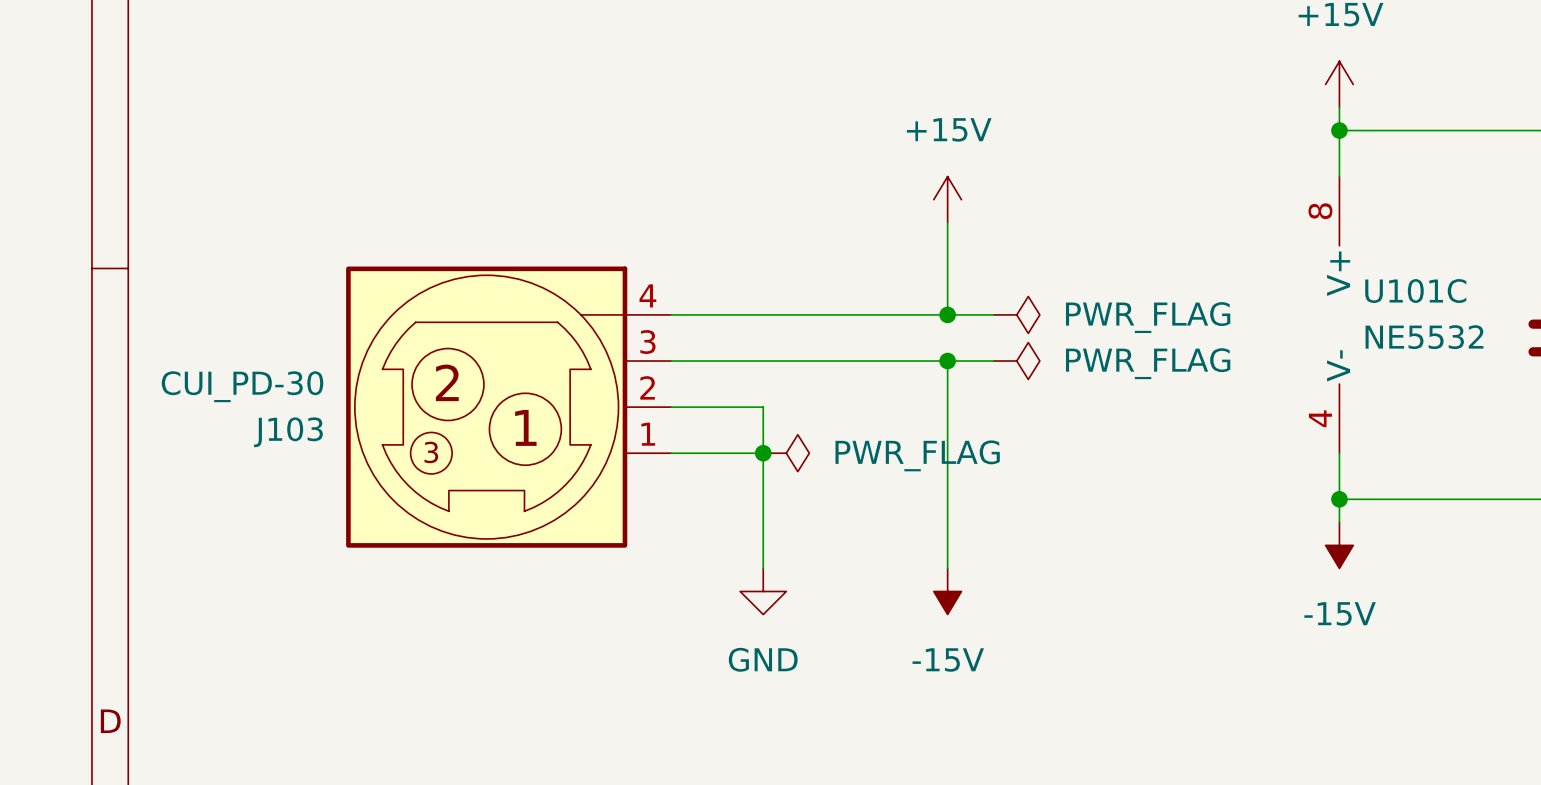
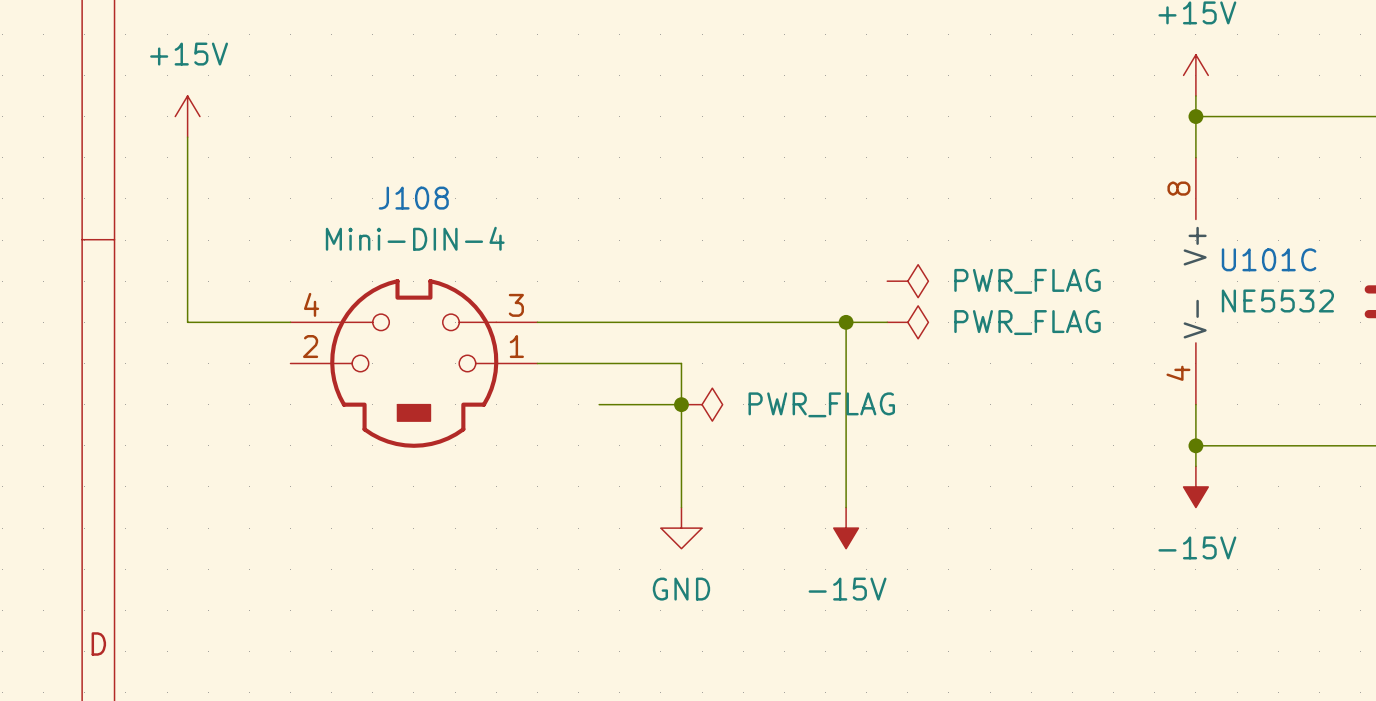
power symbol: none -> +15V (187, 116)
wire: none -> (187, 137) (187, 322) (290, 322)
power symbol: +15V (947, 199) -> none
wire: (947, 222) (947, 314) -> none
wire: (671, 314) (993, 314) -> none
junction: (947, 314) -> none
J108: none -> Mini-DIN-4 (413, 363)
J103: CUI_PD-30 (508, 407) -> none

